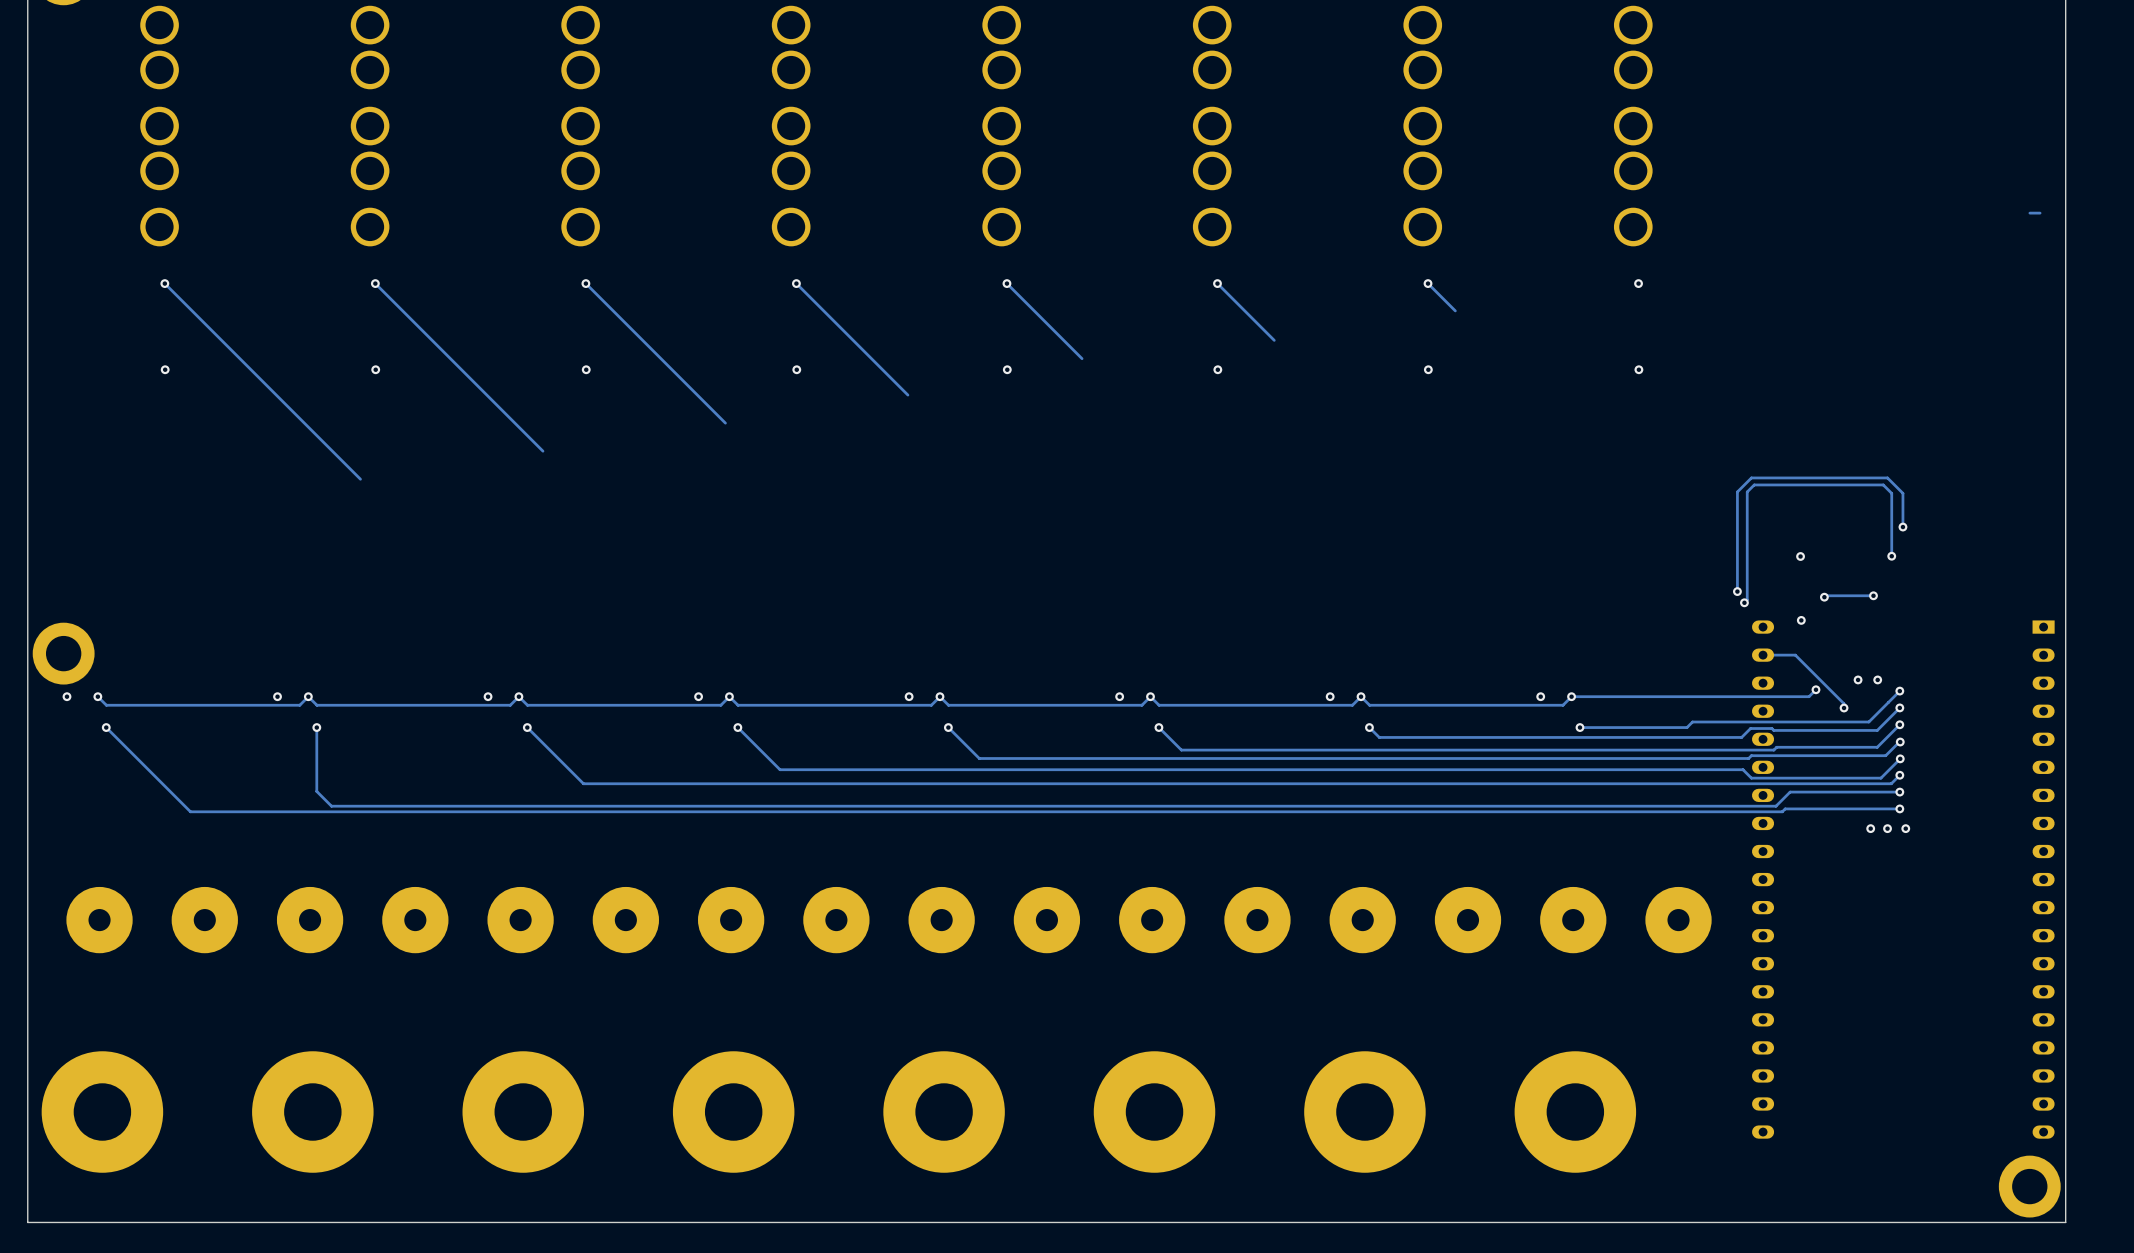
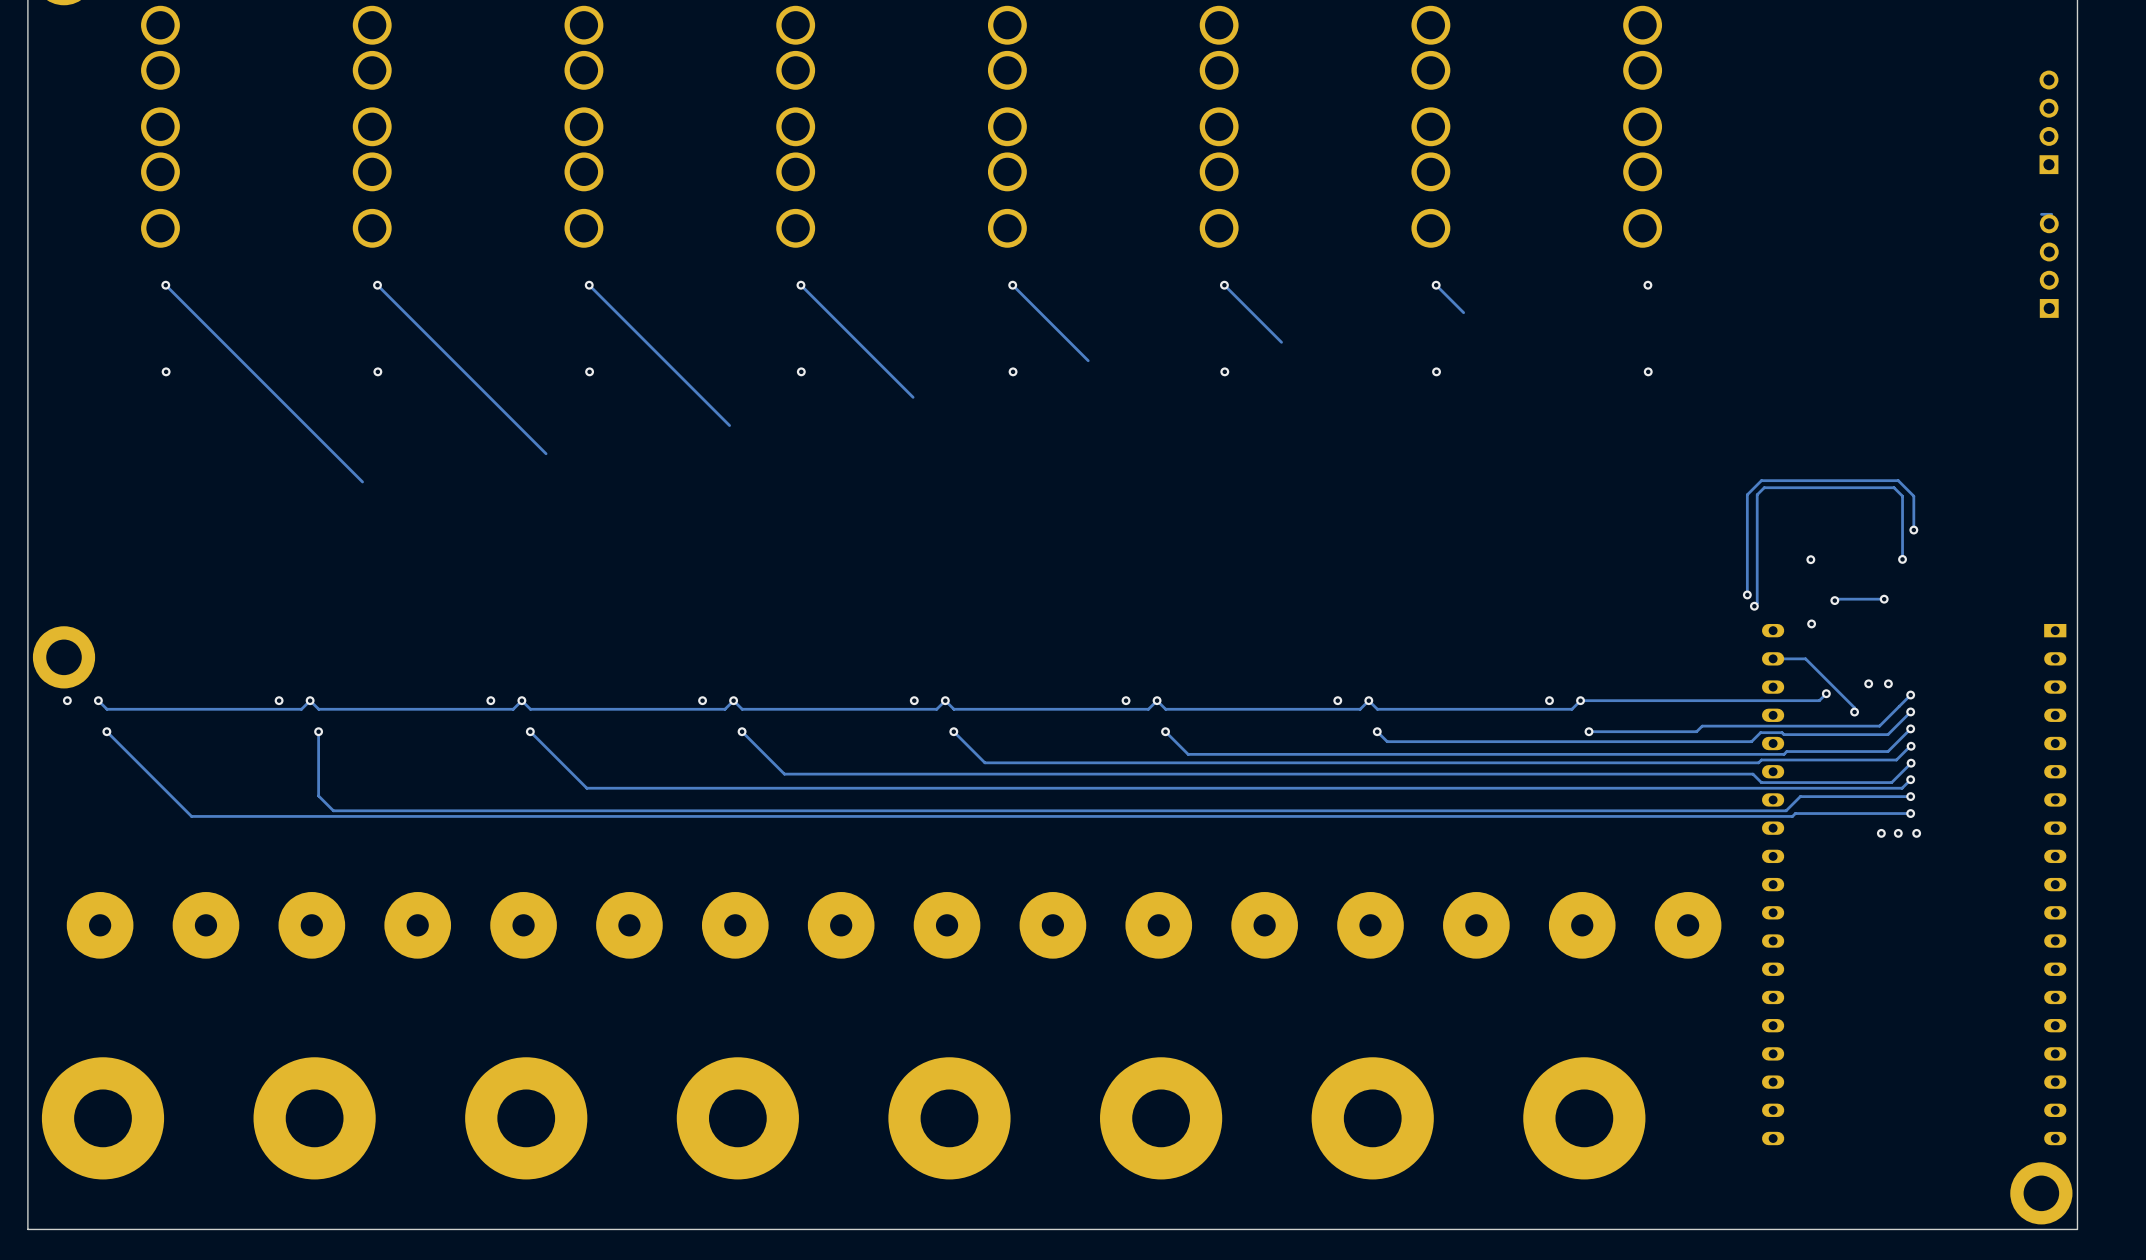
part: none -> (2048, 122)
part: none -> (2049, 266)

